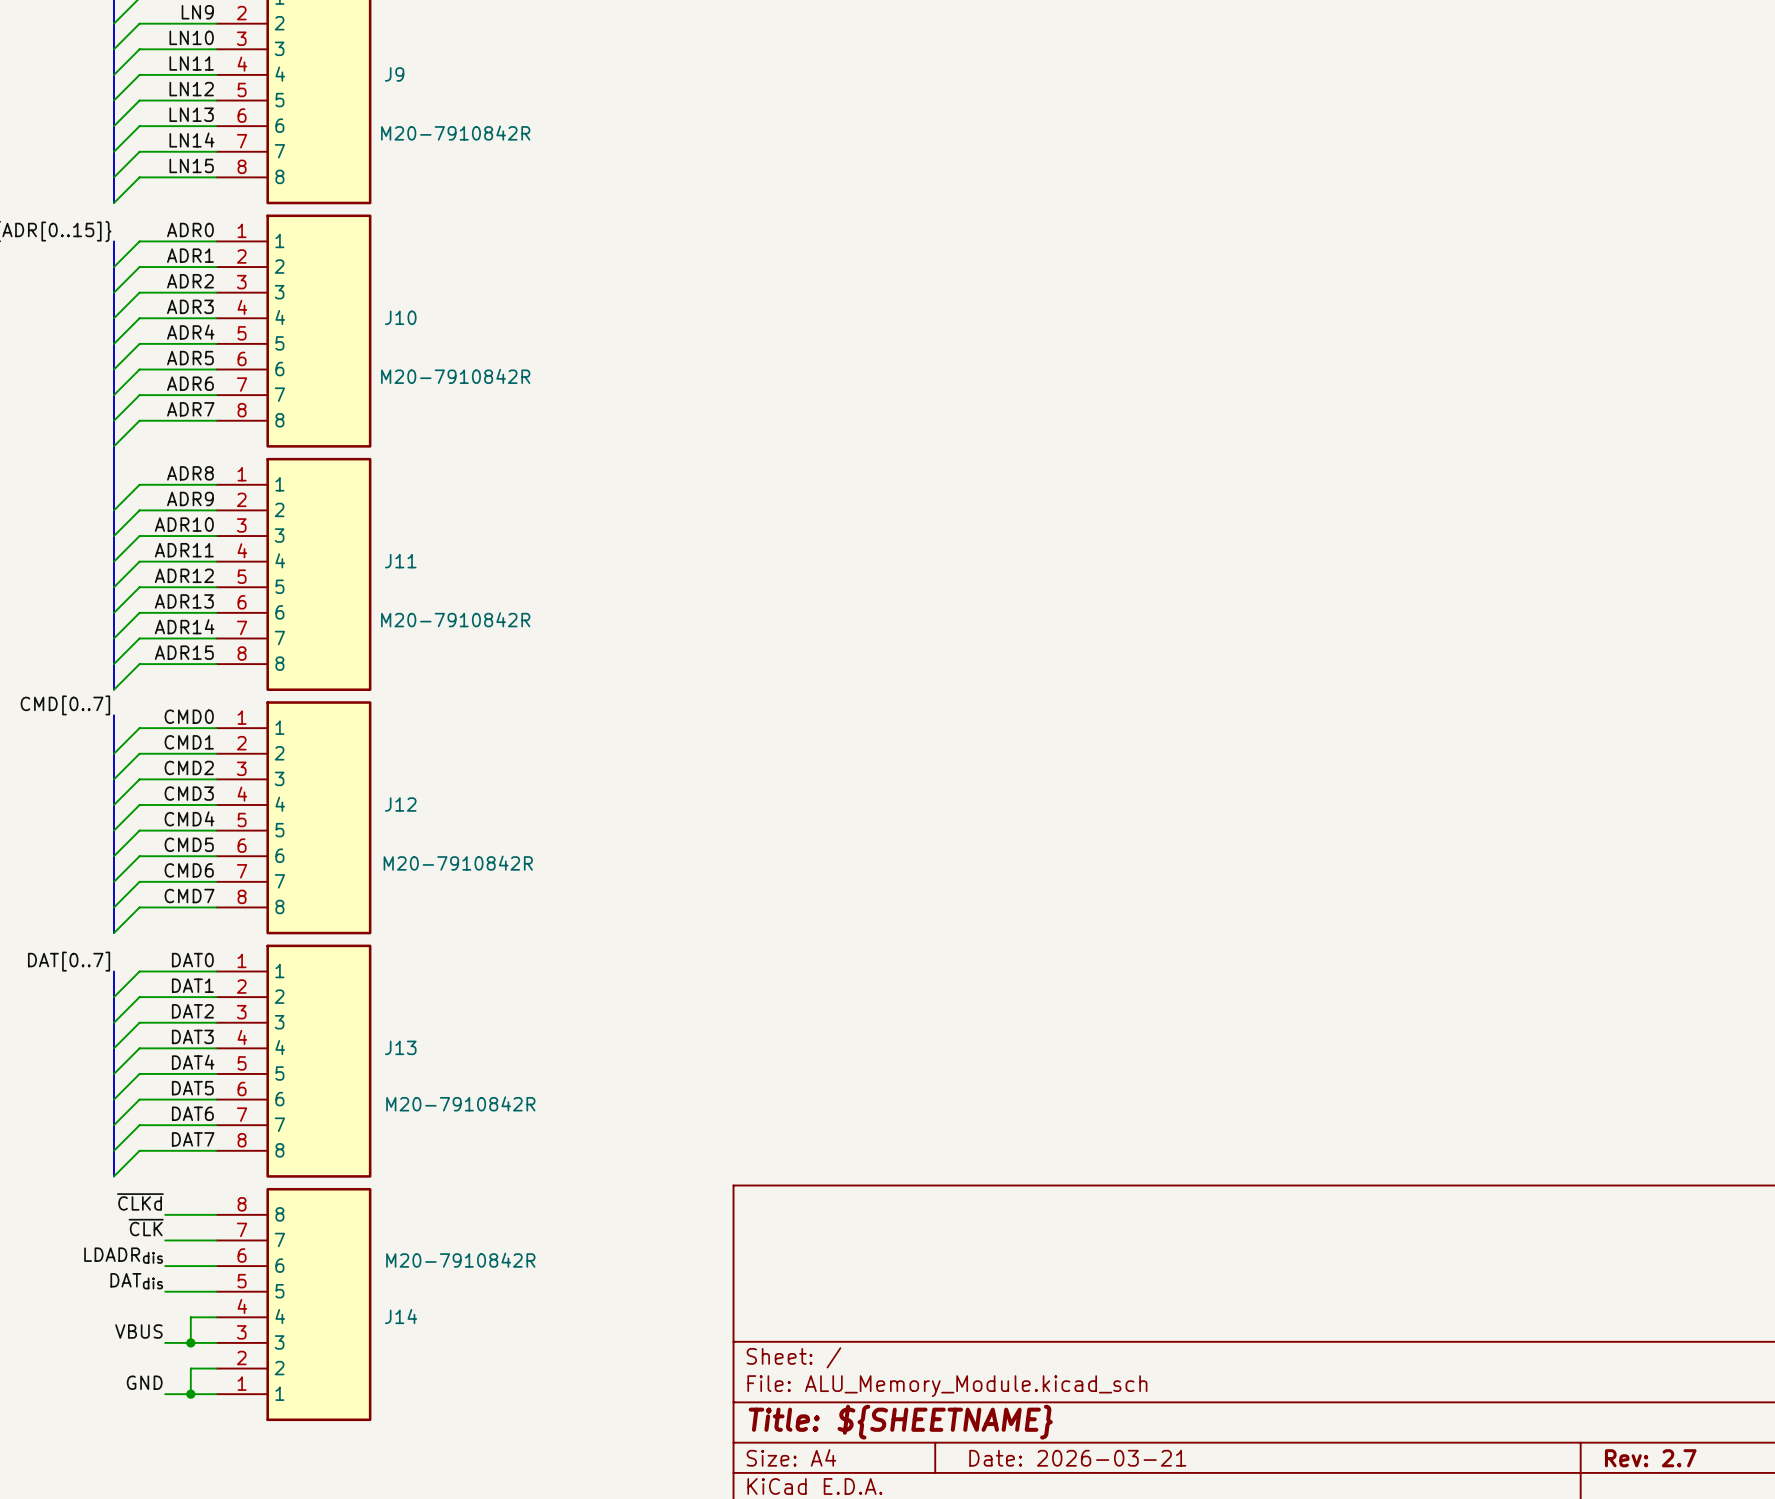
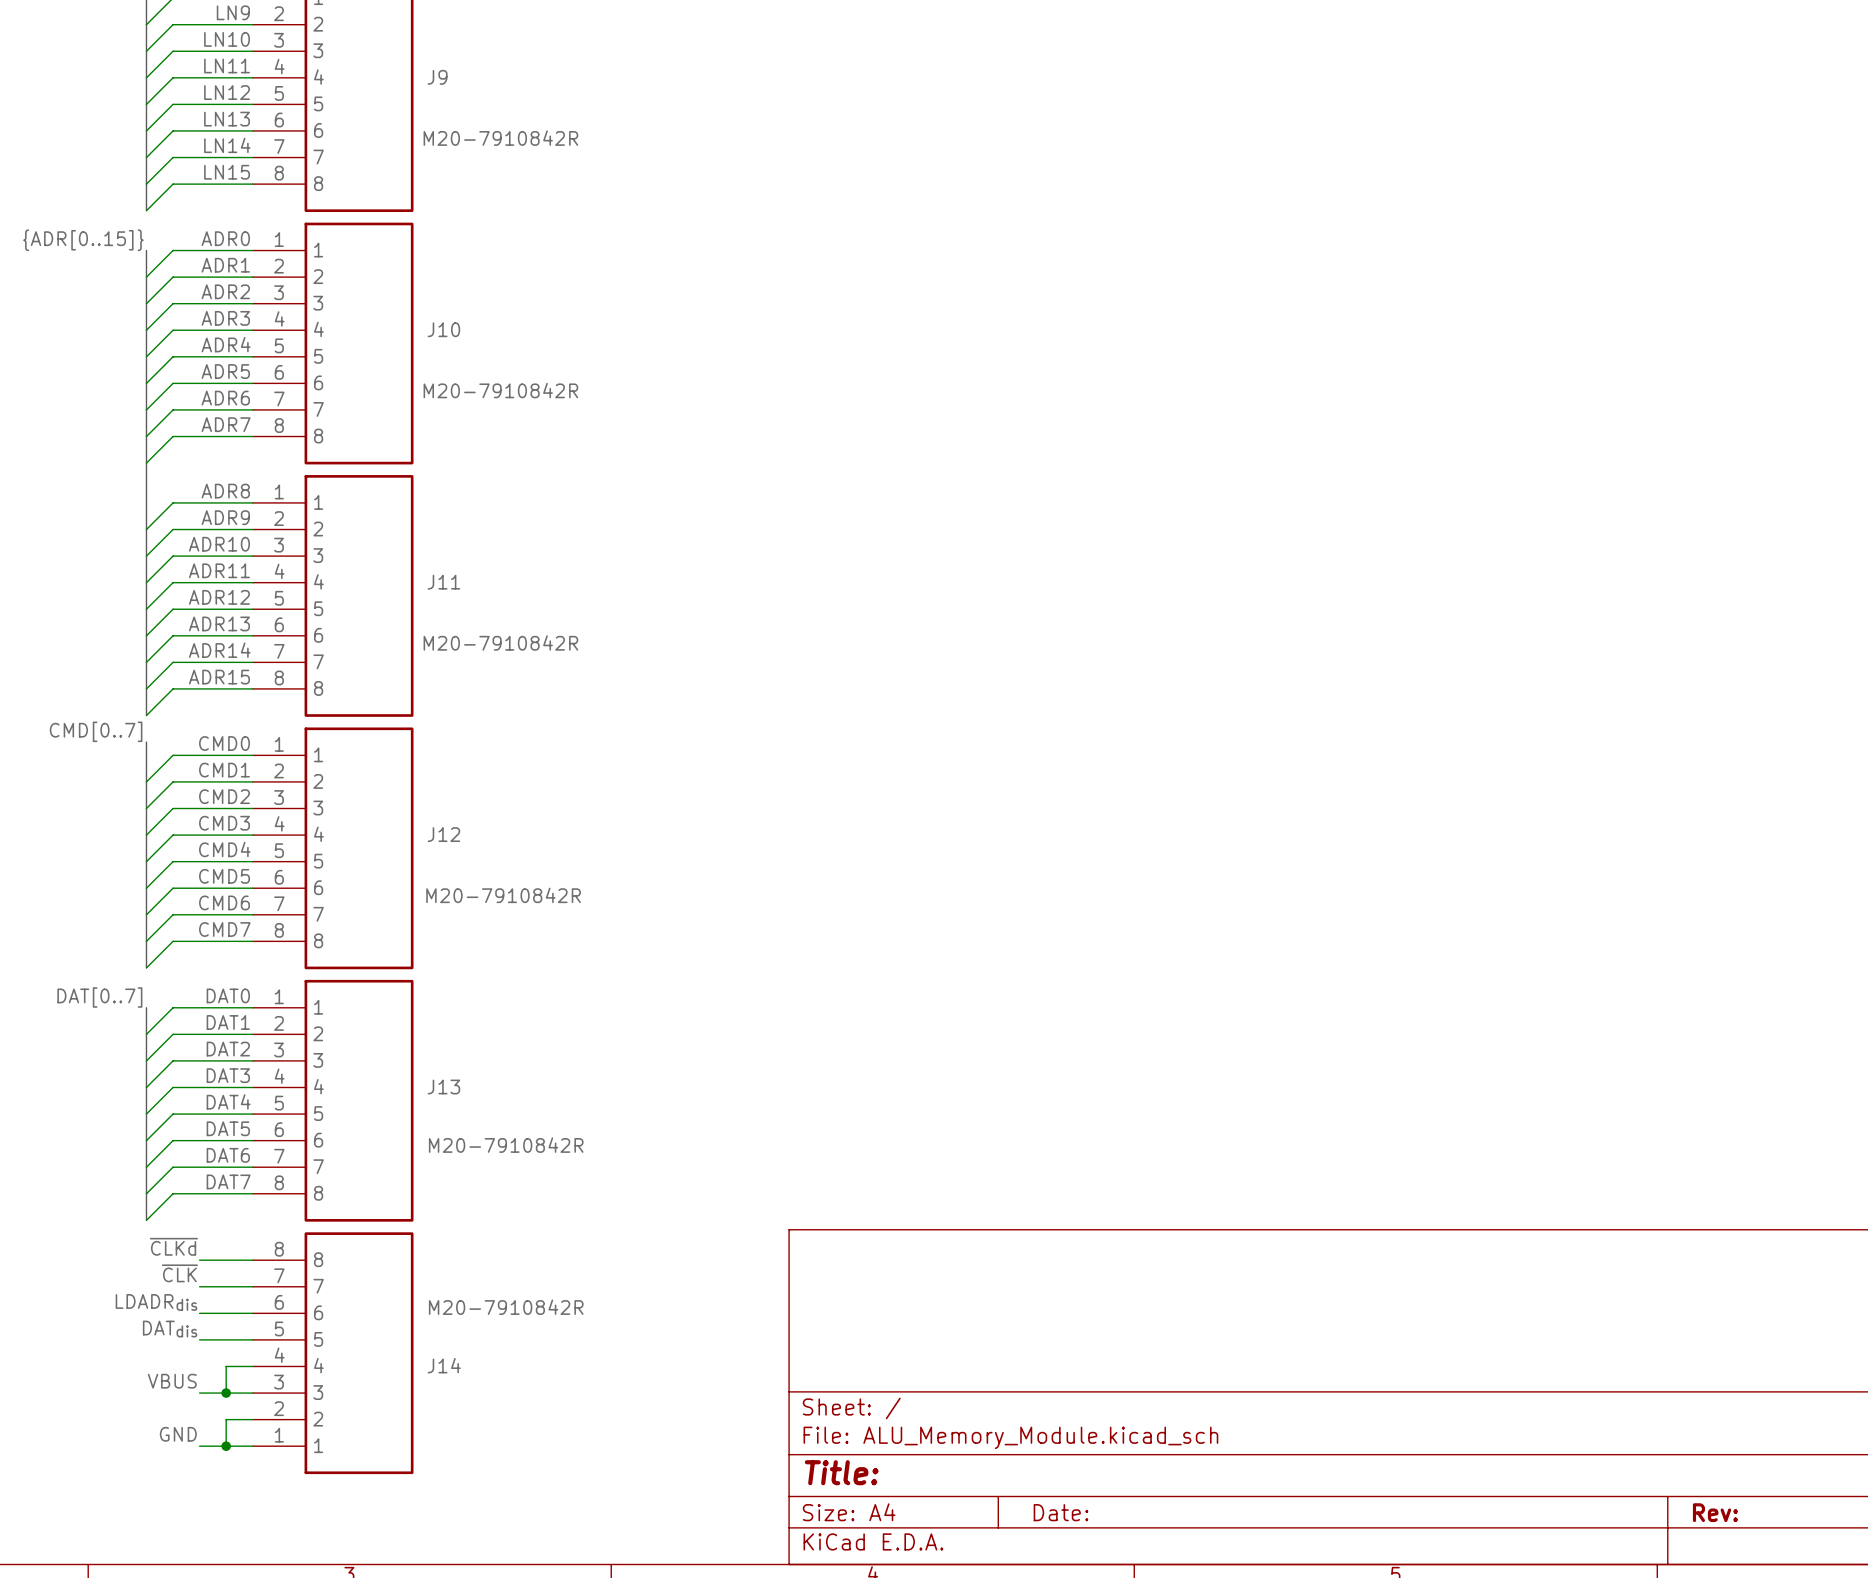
title block: Title: ${SHEETNAME} (900, 1422) -> Title: (841, 1472)
title block: Date: 2026-03-21 (1077, 1458) -> Date: (1060, 1512)
title block: Rev: 2.7 (1650, 1458) -> Rev: (1715, 1512)

